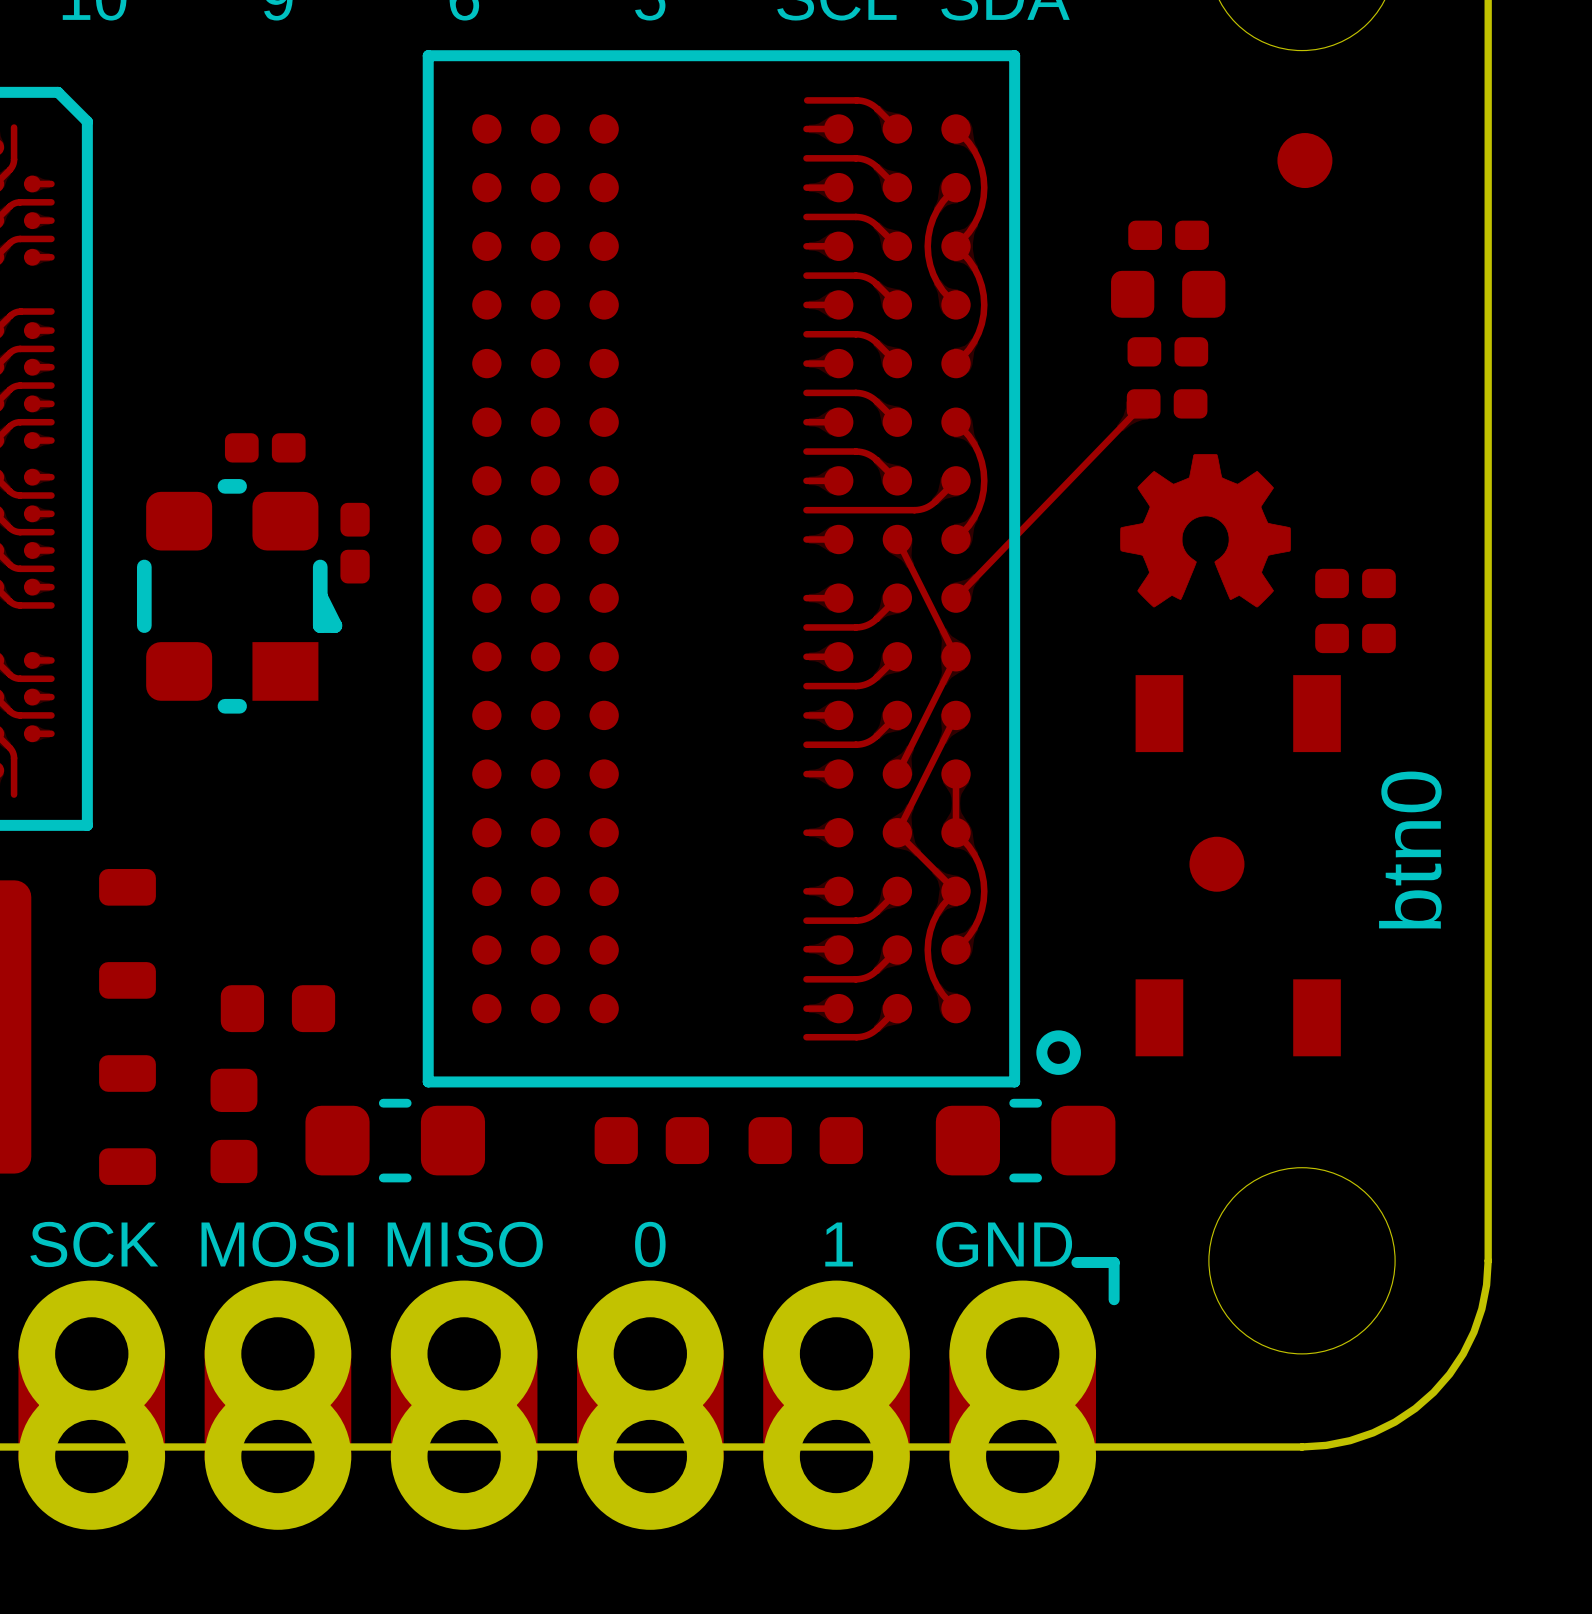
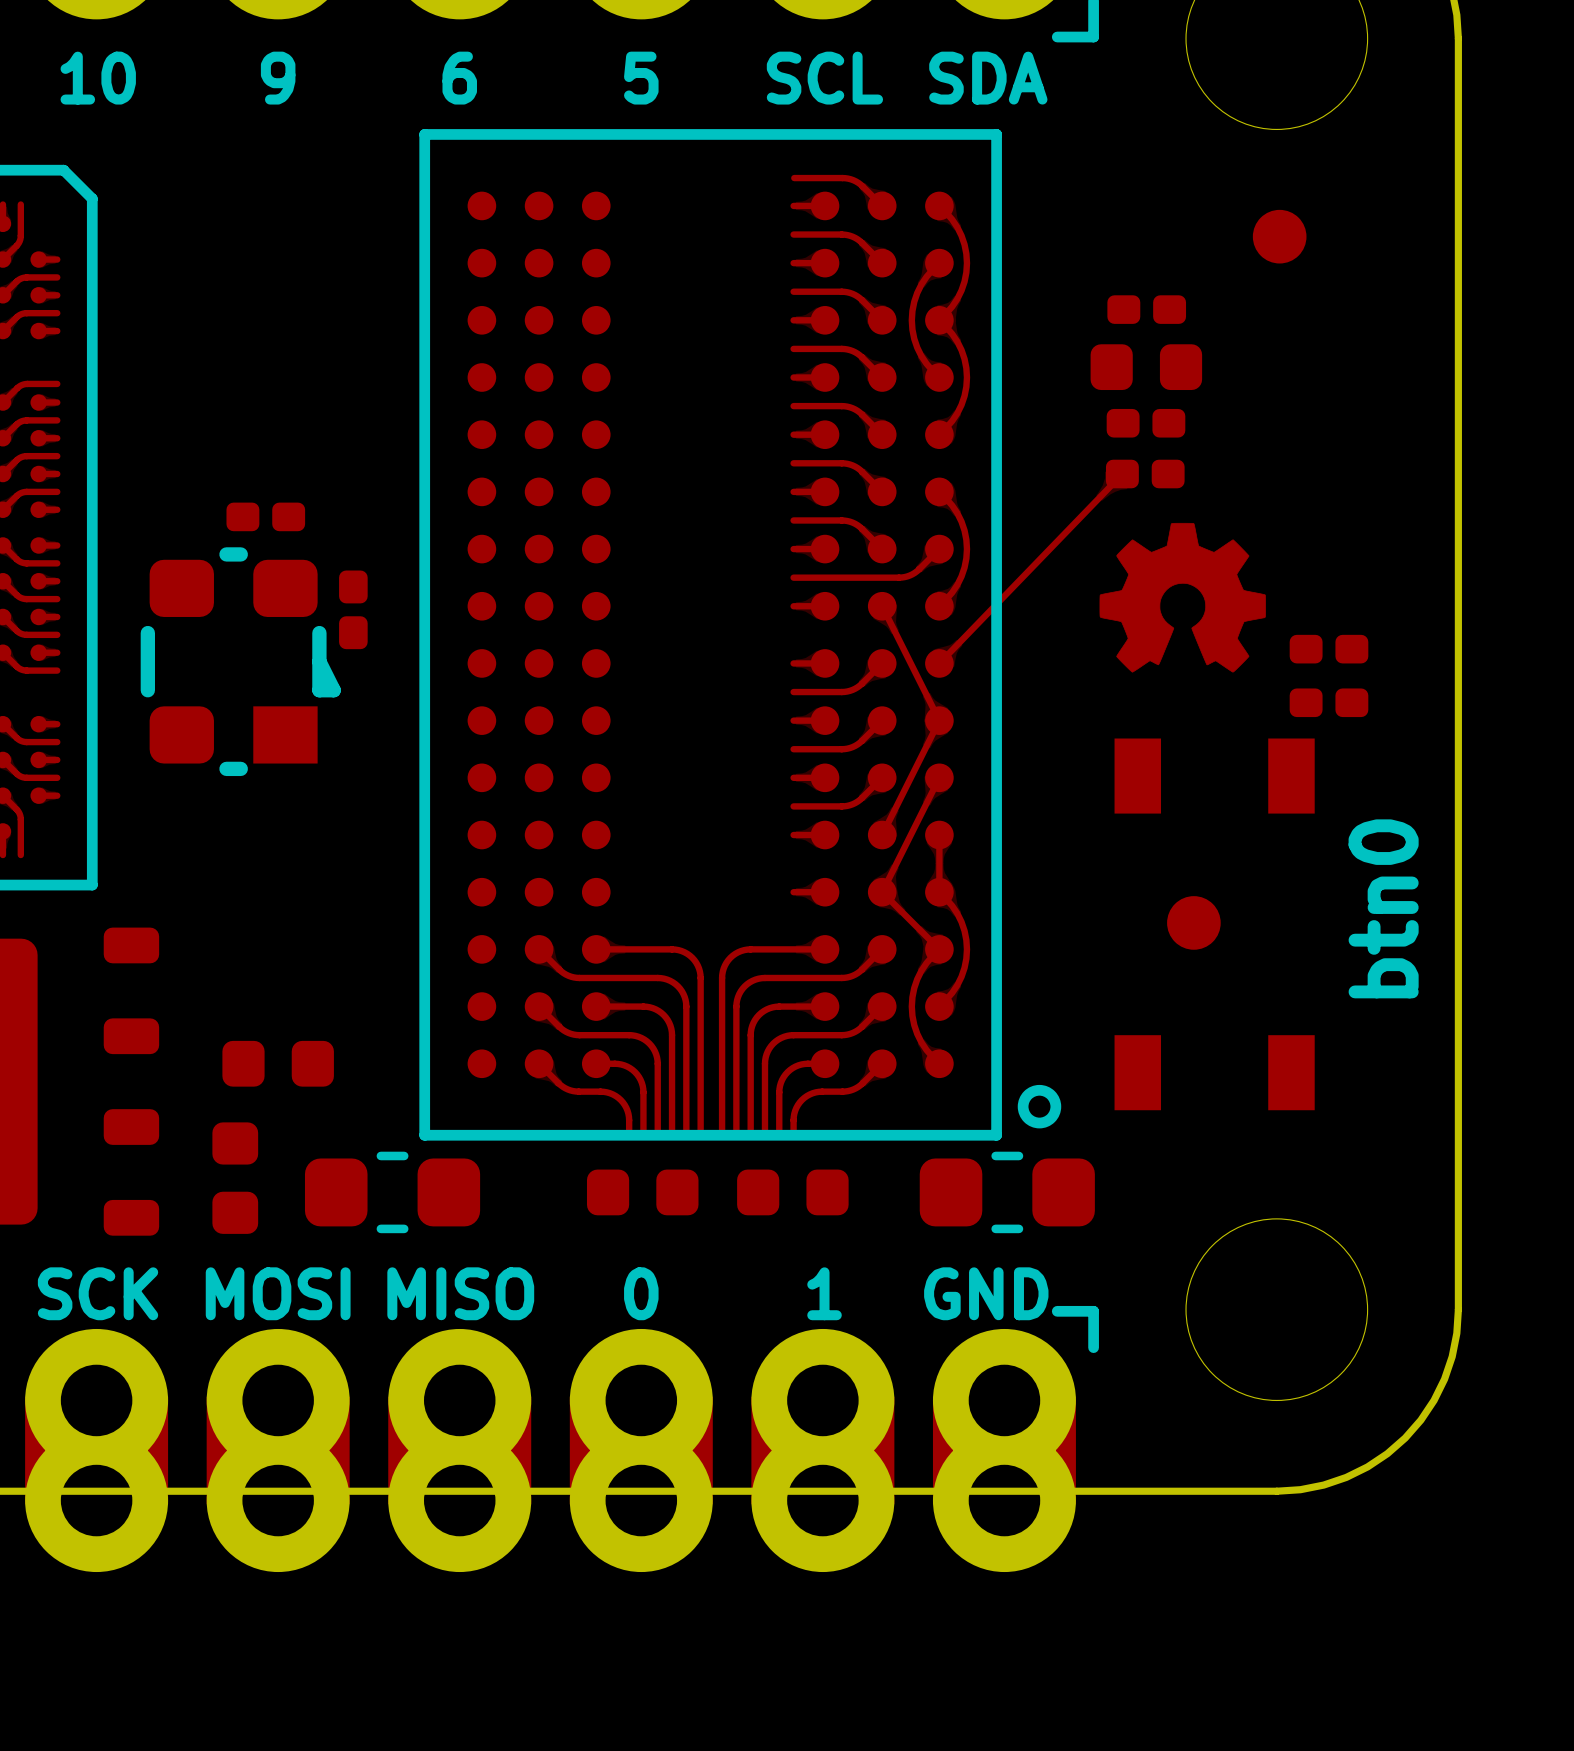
track: none -> (539, 949) (561, 971) (571, 976) (660, 978) (670, 980) (680, 988) (684, 997) (686, 1006) (686, 1133)
track: none -> (596, 949) (675, 949) (687, 953) (696, 962) (700, 977) (700, 1133)
track: none -> (793, 949) (744, 950) (730, 957) (723, 968) (722, 977) (722, 1133)
track: none -> (793, 977) (755, 979) (744, 986) (737, 997) (736, 1133)
track: none -> (539, 1006) (561, 1028) (571, 1033) (632, 1035) (641, 1038) (649, 1043) (654, 1051) (657, 1060) (657, 1133)
track: none -> (596, 1006) (649, 1007) (661, 1012) (667, 1019) (672, 1035) (672, 1133)
track: (806, 949) (837, 949) -> (750, 1133) (750, 1035) (755, 1019) (764, 1010) (772, 1007) (825, 1006)
track: none -> (793, 1035) (784, 1036) (775, 1041) (766, 1054) (764, 1133)
track: none -> (539, 1063) (560, 1085) (567, 1089) (576, 1091) (603, 1091) (618, 1097) (627, 1110) (629, 1133)
track: none -> (596, 1063) (624, 1065) (632, 1070) (639, 1077) (643, 1089) (643, 1133)
track: (806, 1008) (821, 1008) -> (779, 1133) (780, 1082) (785, 1074) (792, 1068) (807, 1063)
track: (806, 1037) (835, 1037) -> (793, 1133) (793, 1117) (797, 1105) (809, 1094) (822, 1091)

